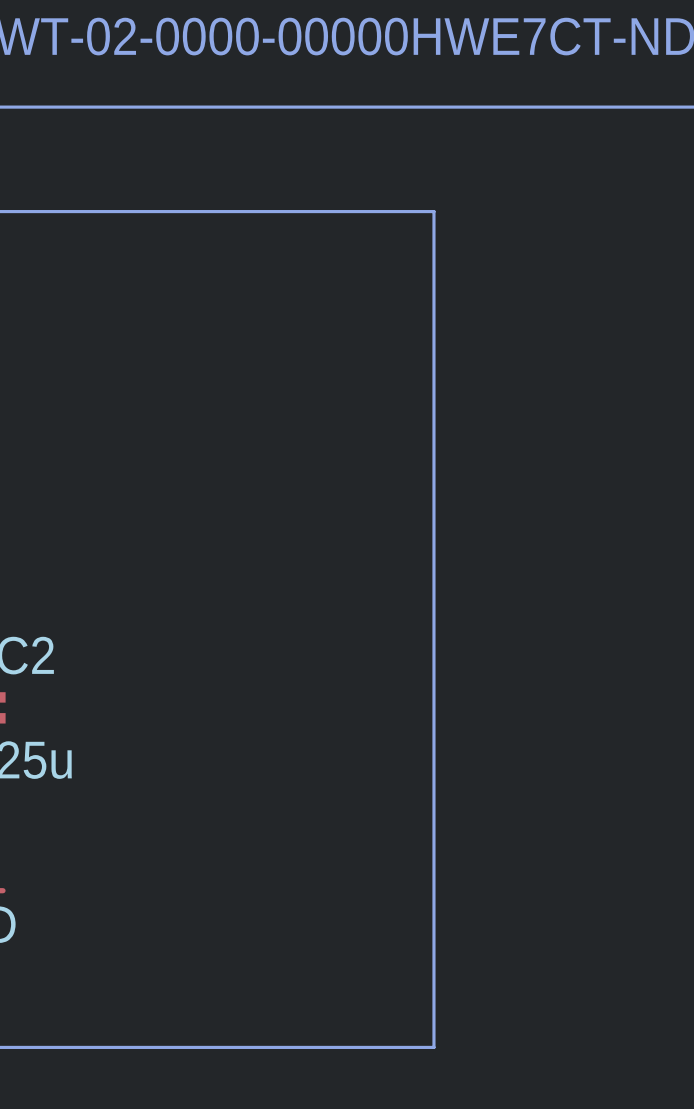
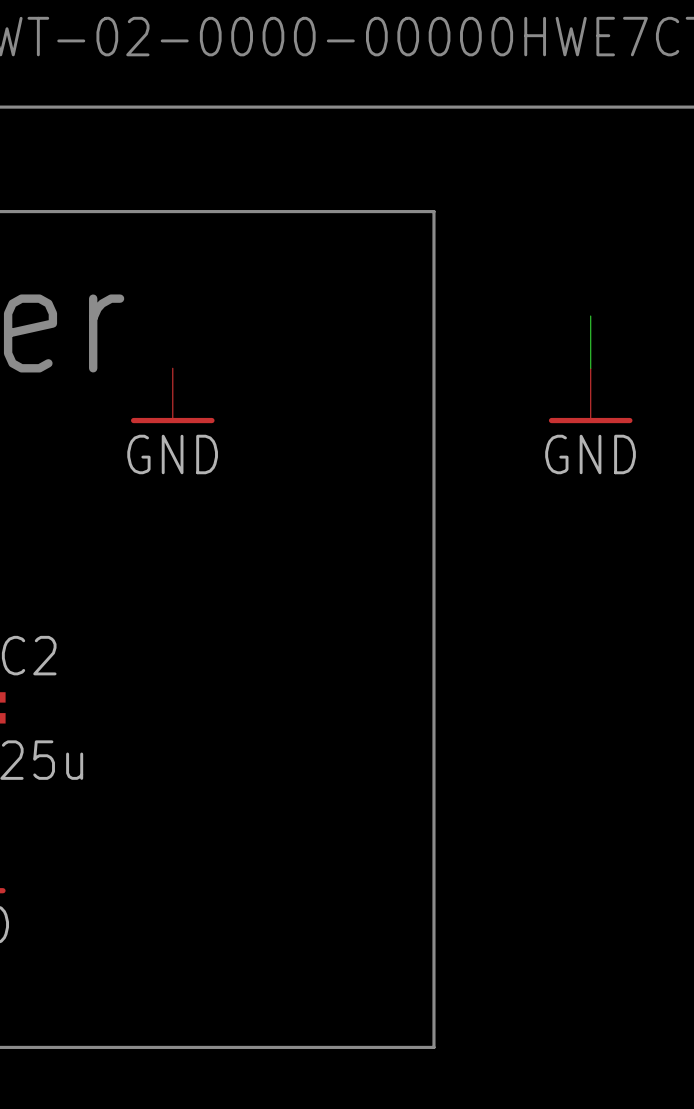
wire: none -> (590, 316) (590, 368)
power symbol: none -> GND (172, 395)
power symbol: none -> GND (590, 395)

